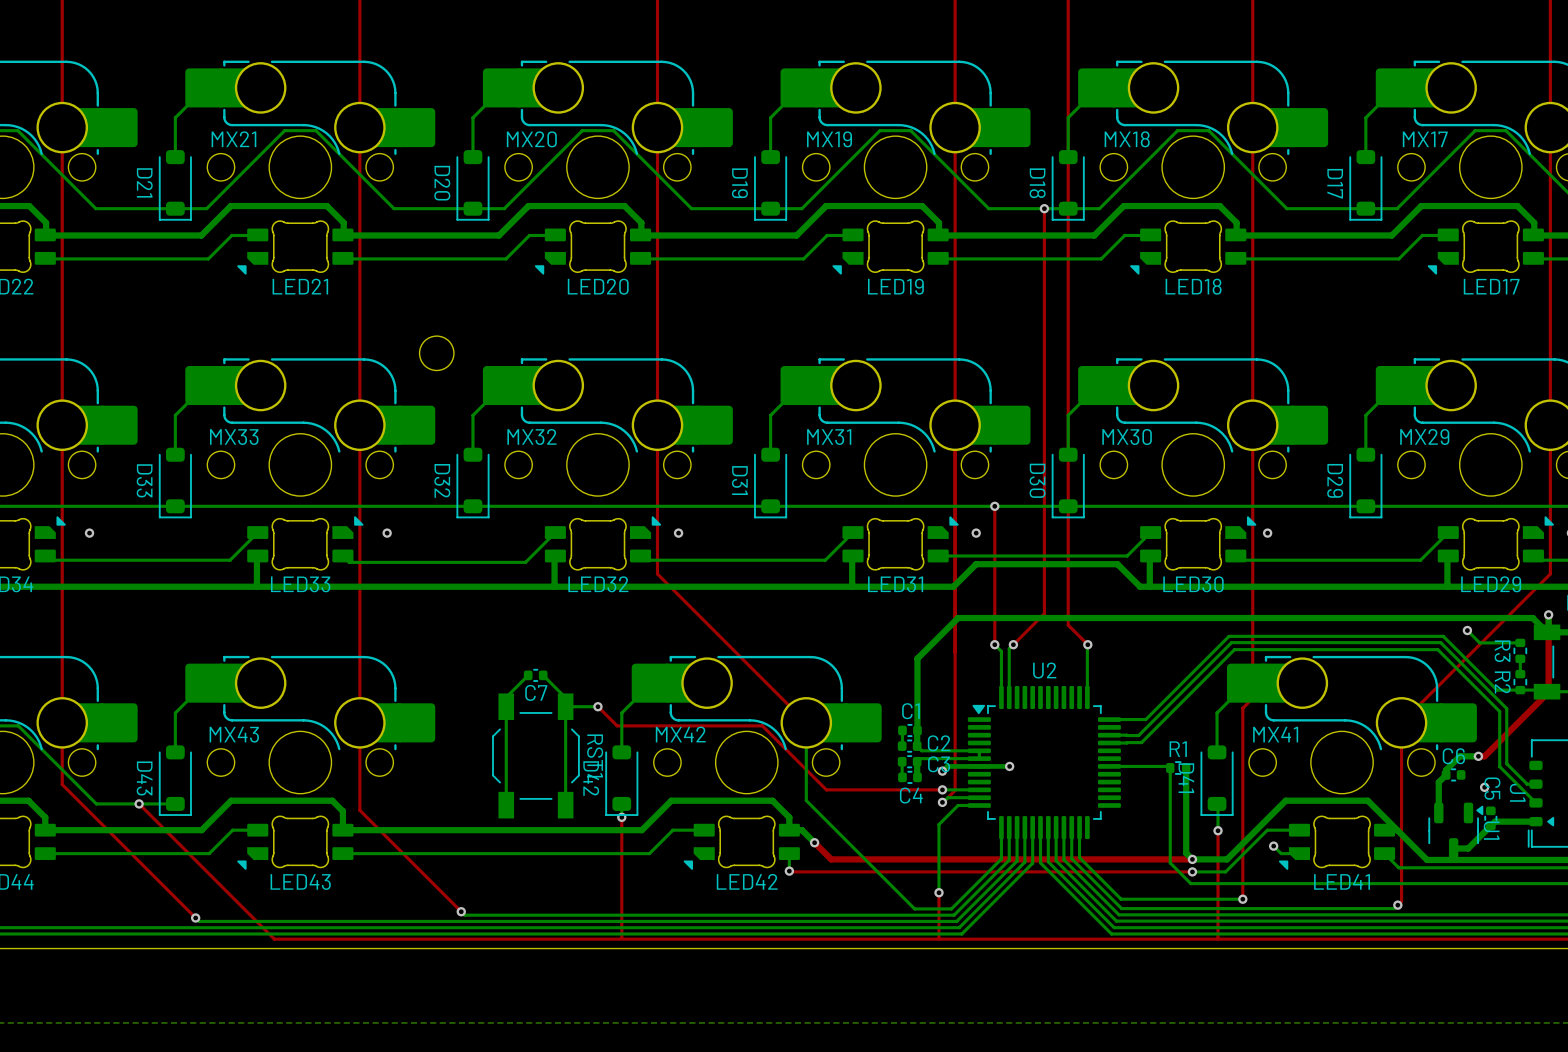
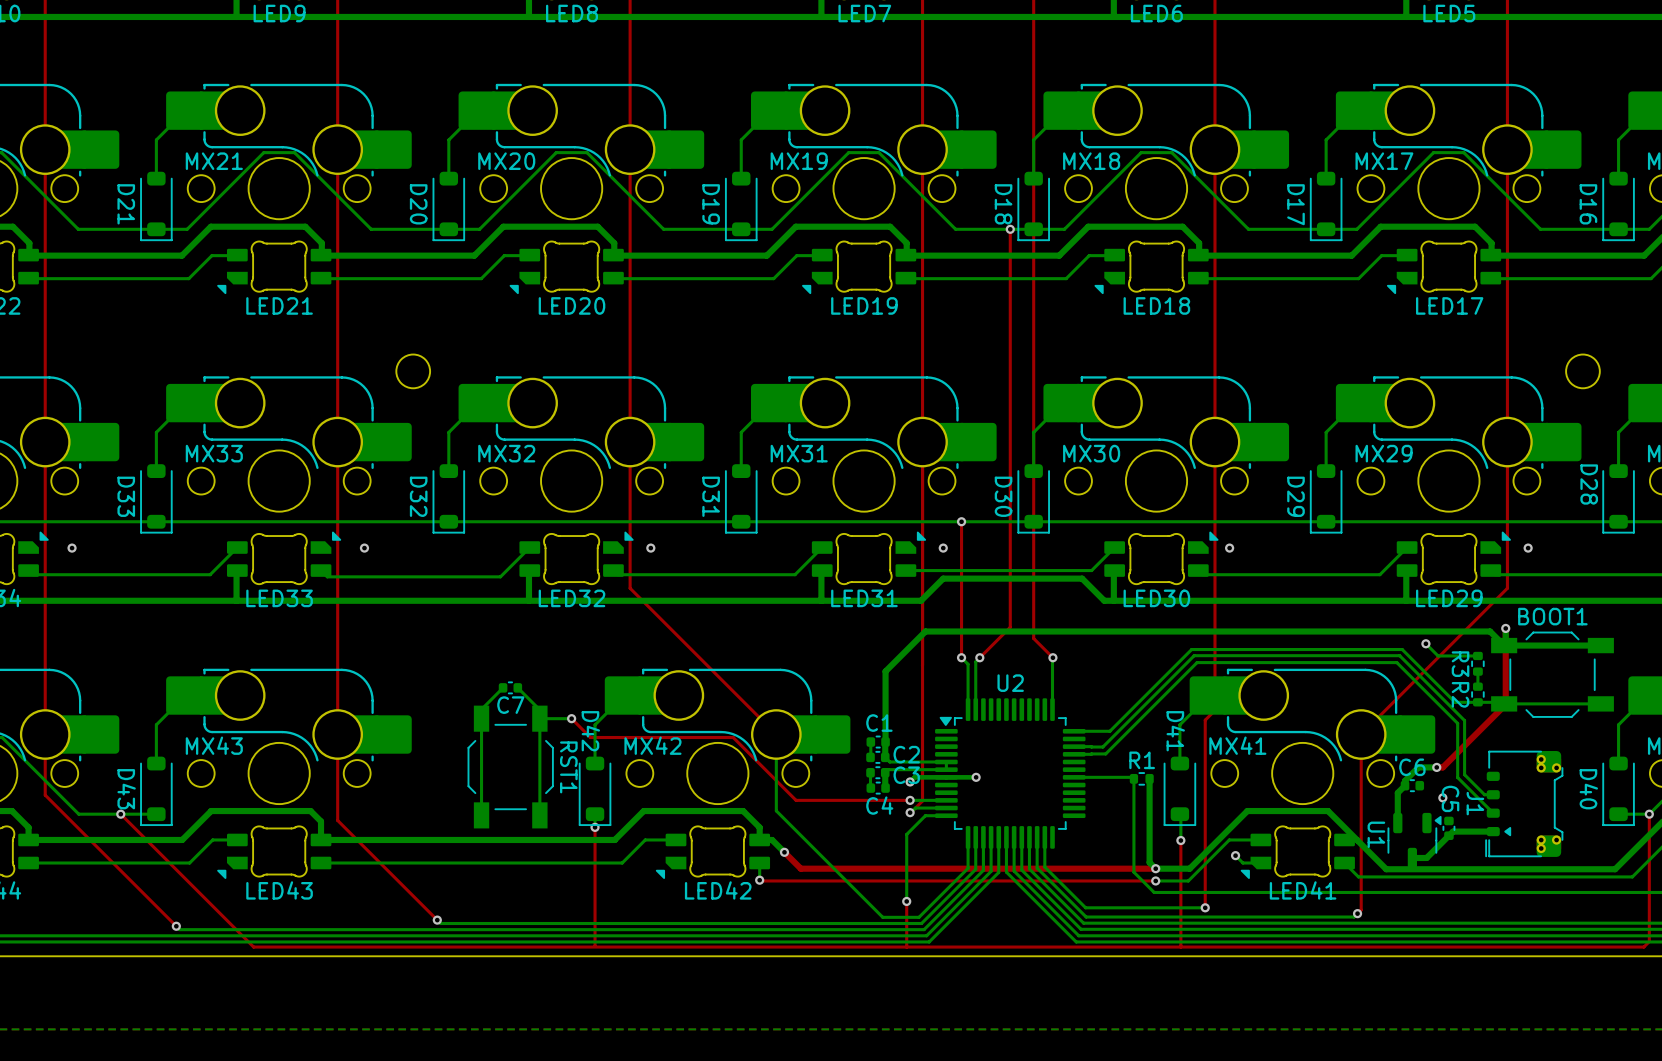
D42 name position: D42 (591, 778) -> D42 (590, 731)
D41 name position: D41 (1186, 778) -> D41 (1175, 731)
U1 name position: U1 (1491, 830) -> U1 (1376, 834)

